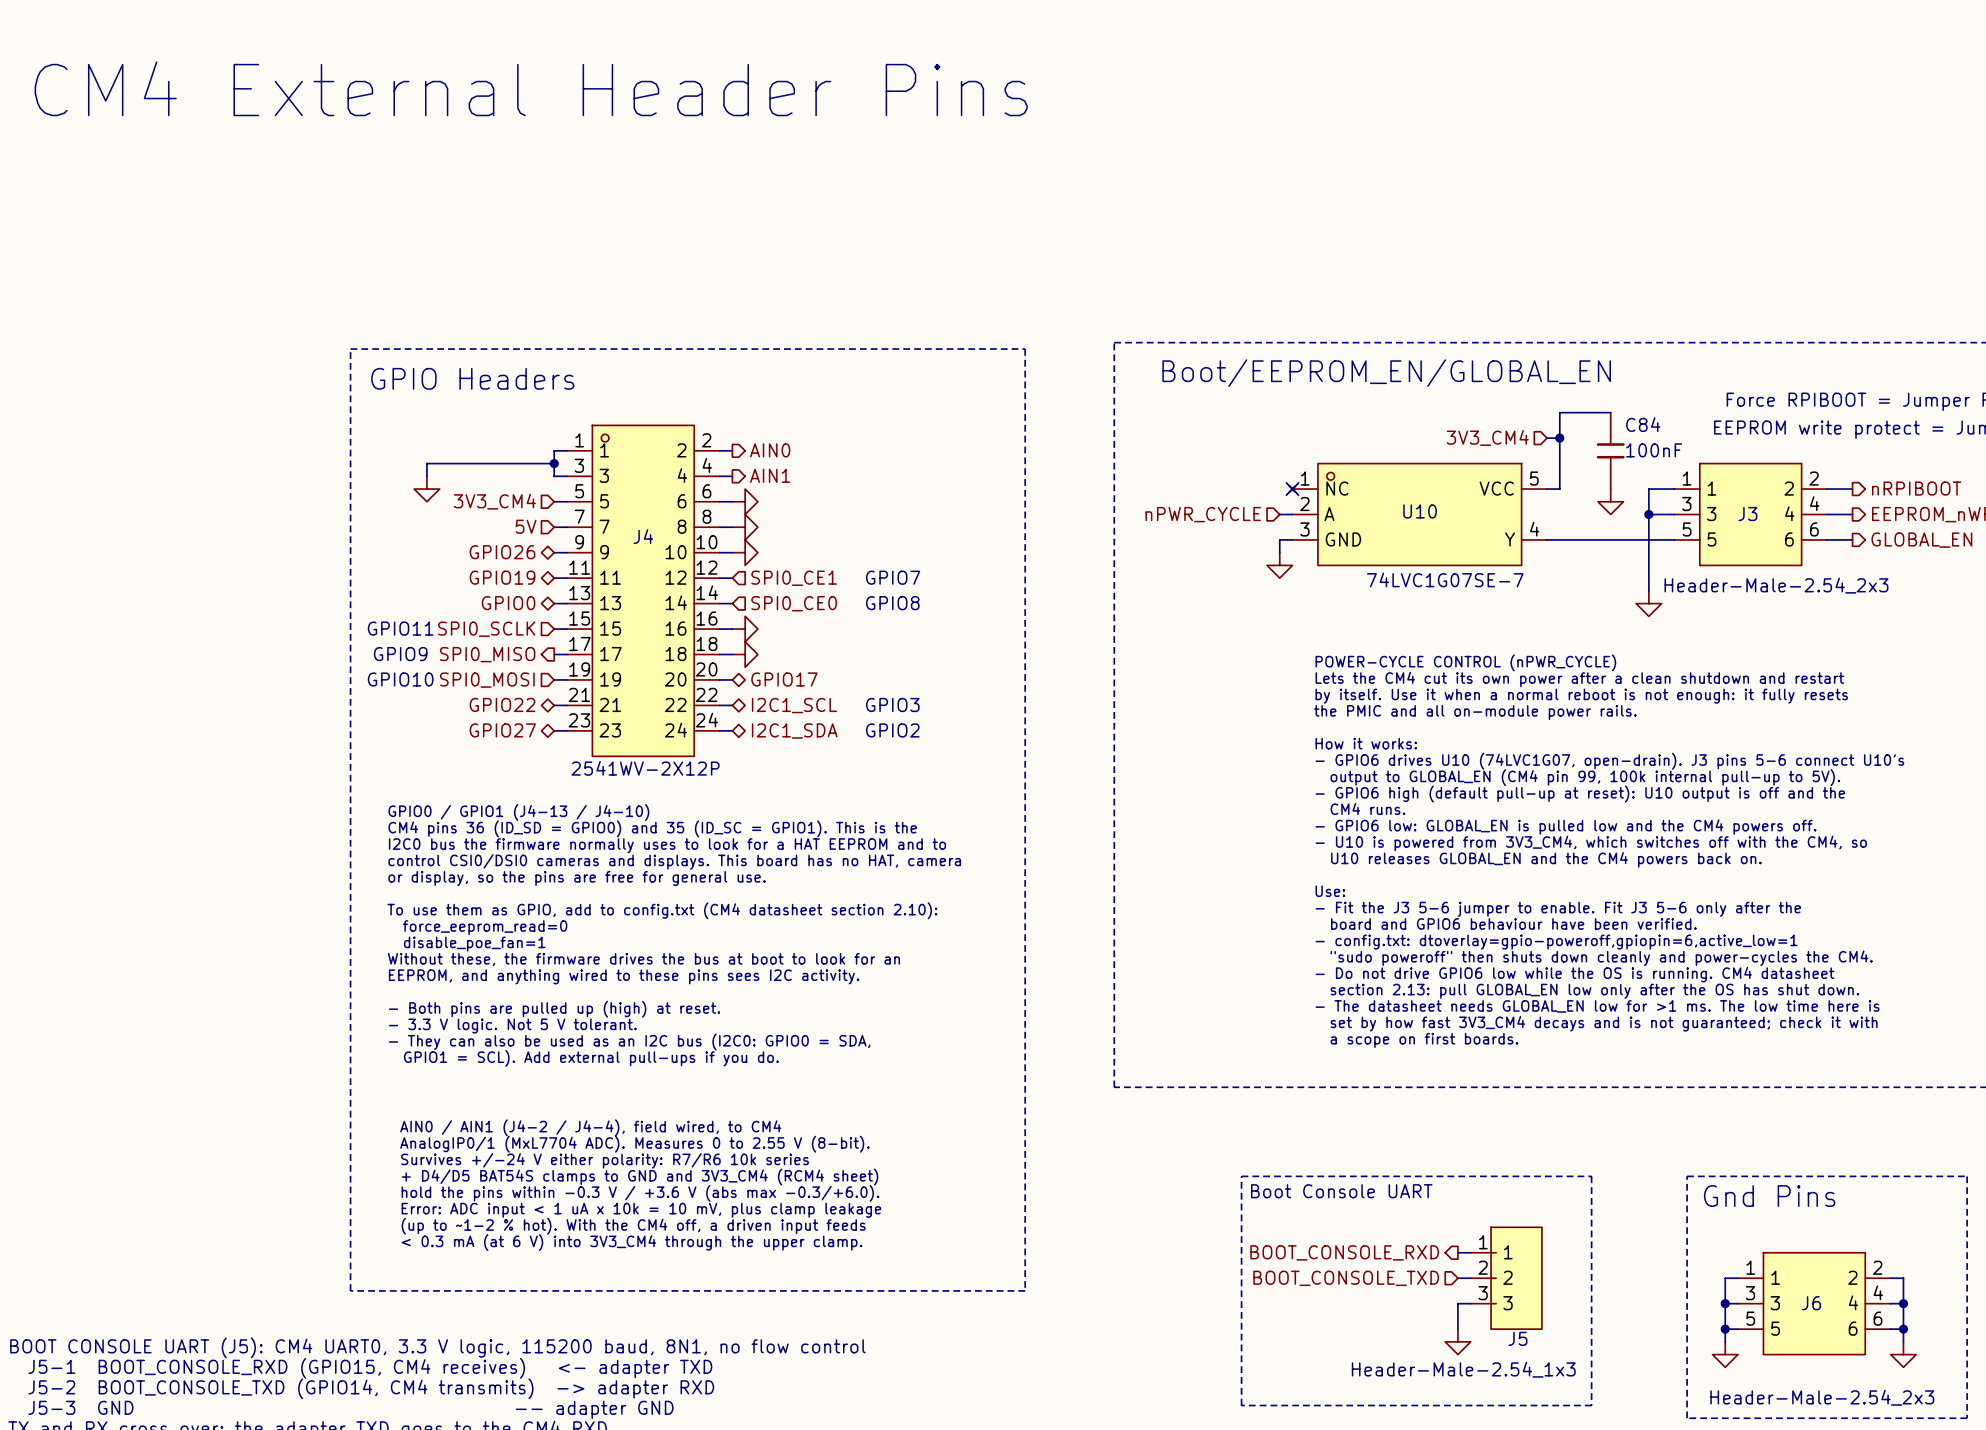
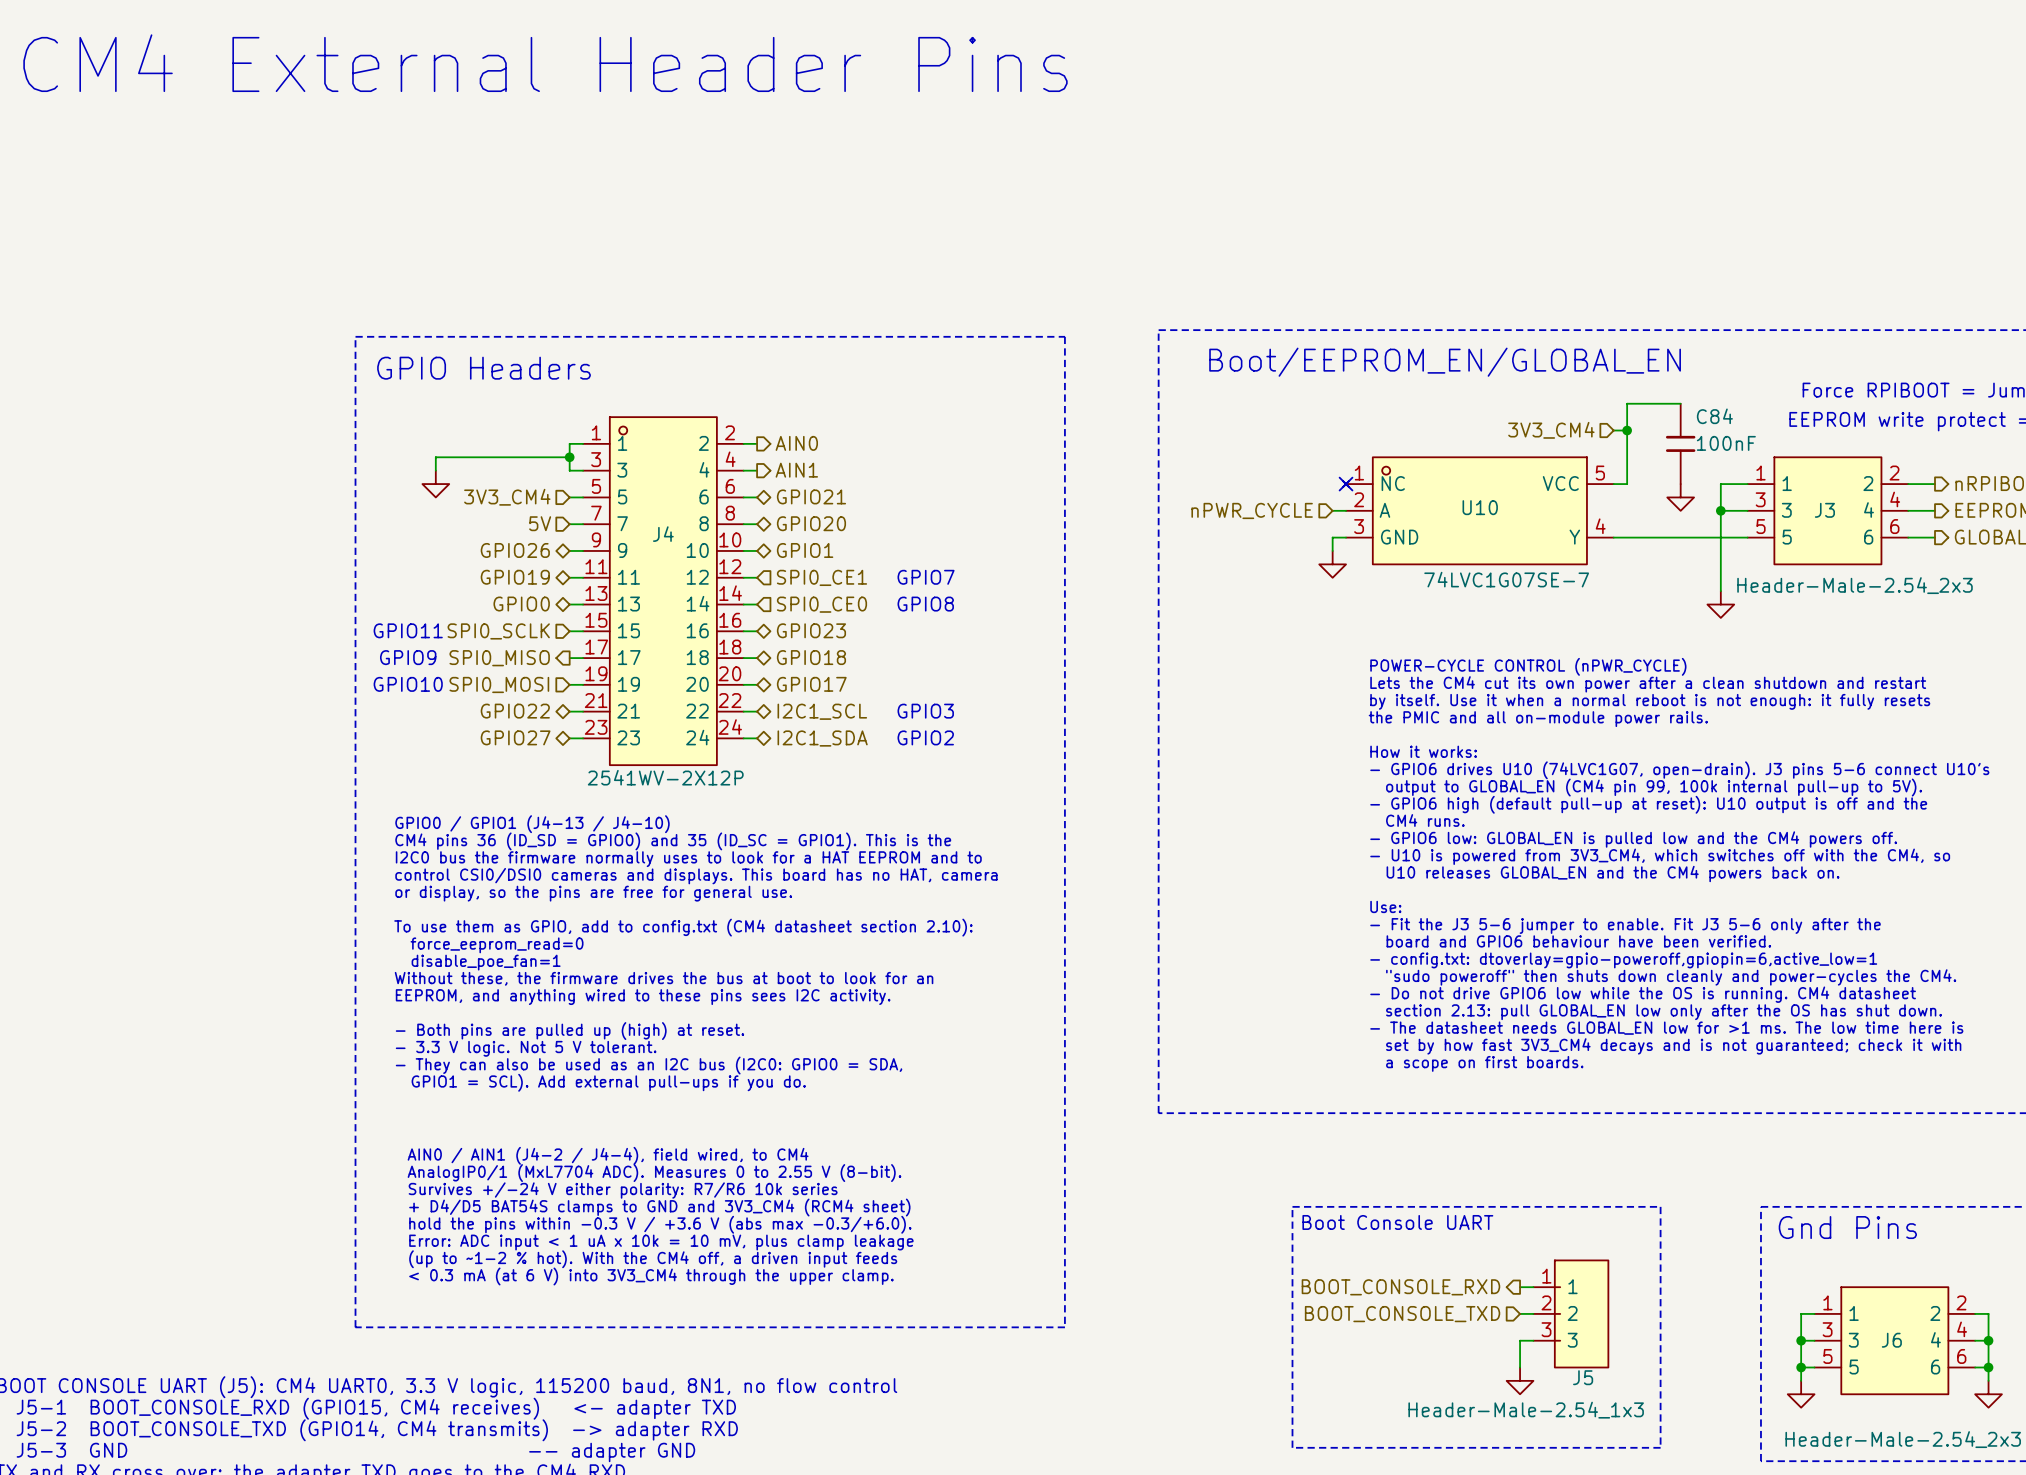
power symbol: (745, 501) -> none
hierarchical label: none -> GPIO21 (811, 496)
hierarchical label: none -> GPIO20 (811, 523)
power symbol: (745, 527) -> none
power symbol: (745, 552) -> none
hierarchical label: none -> GPIO1 (805, 550)
hierarchical label: none -> GPIO23 (811, 630)
power symbol: (745, 629) -> none
power symbol: (745, 654) -> none
hierarchical label: none -> GPIO18 (811, 657)

